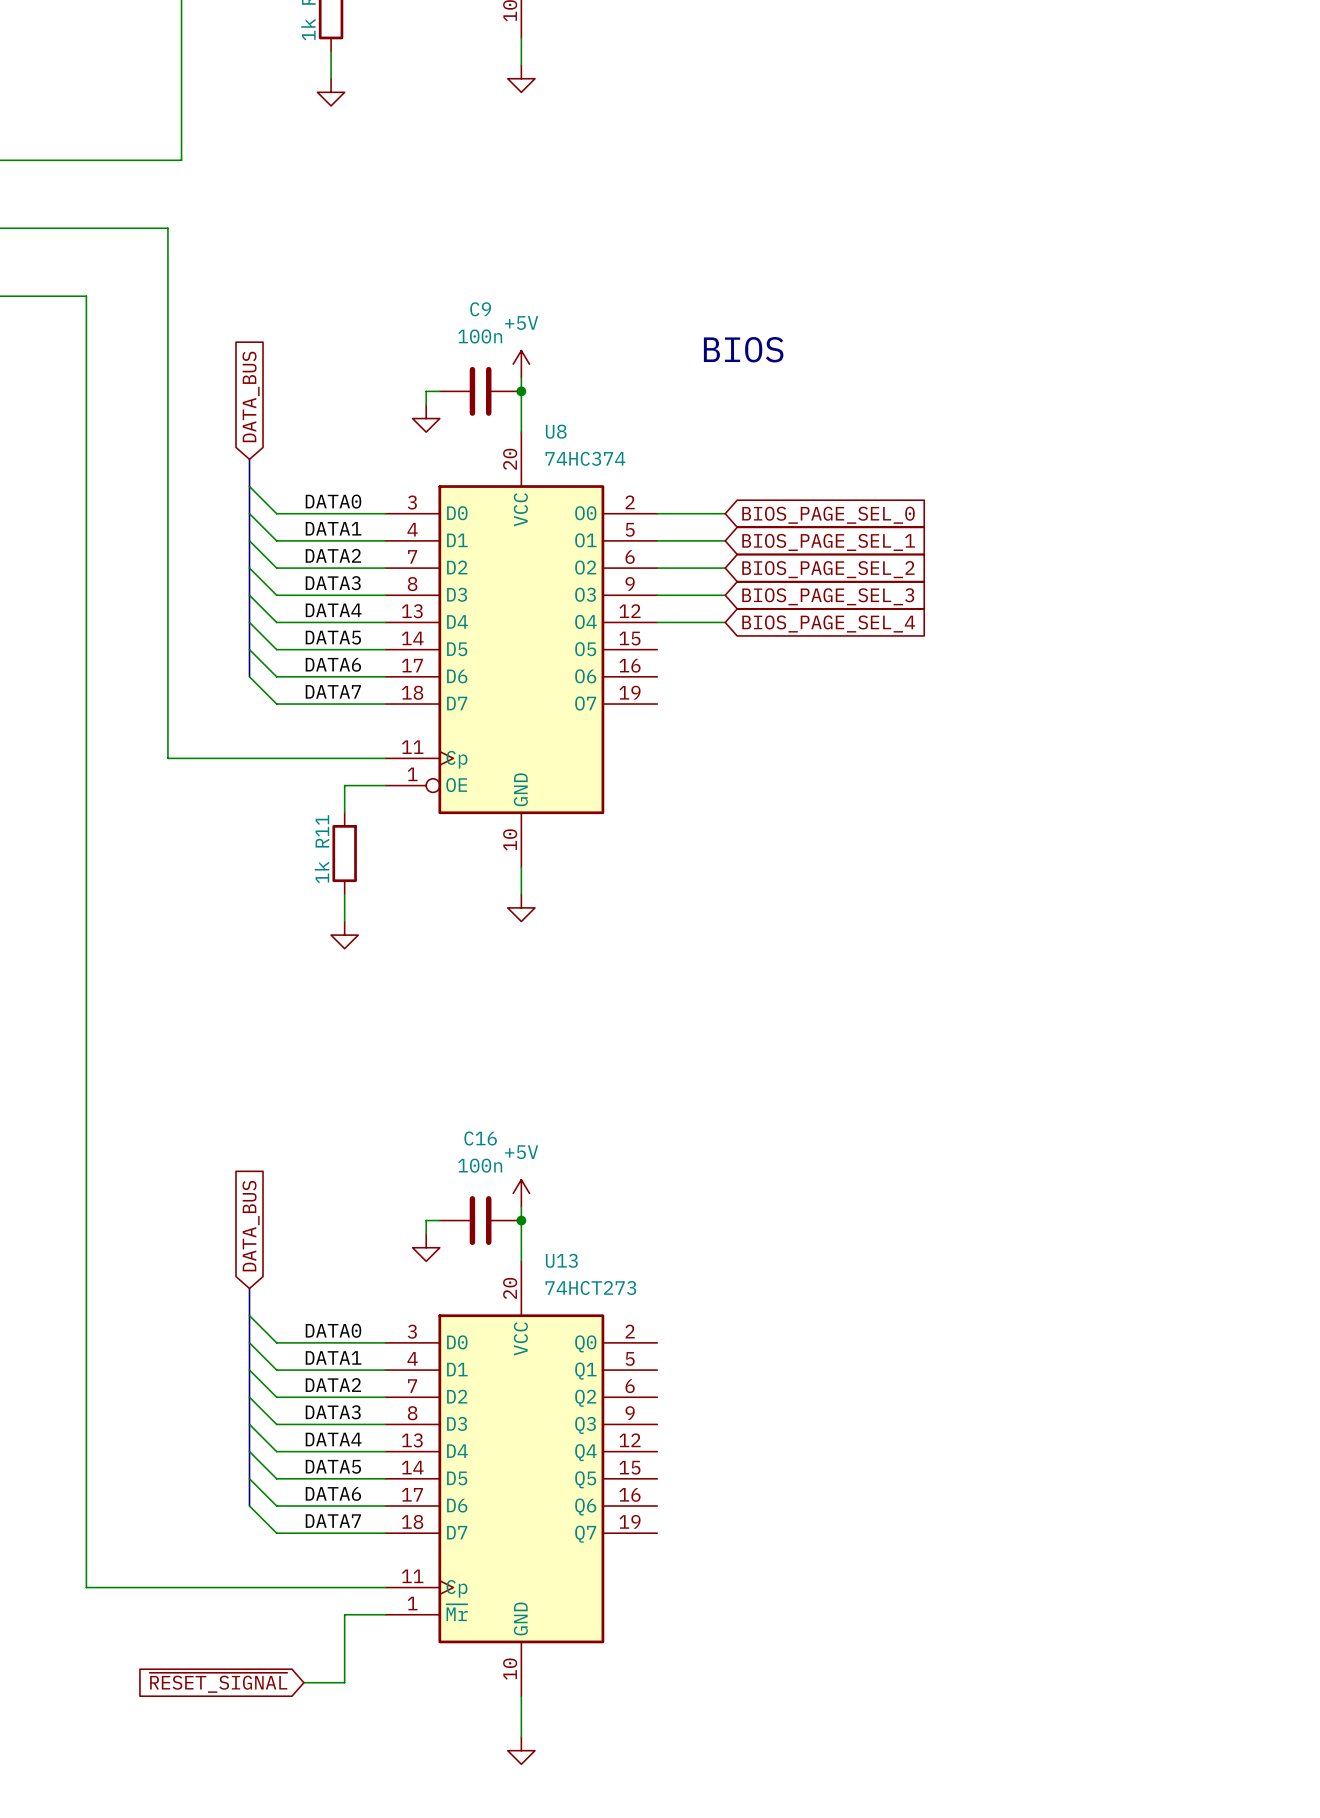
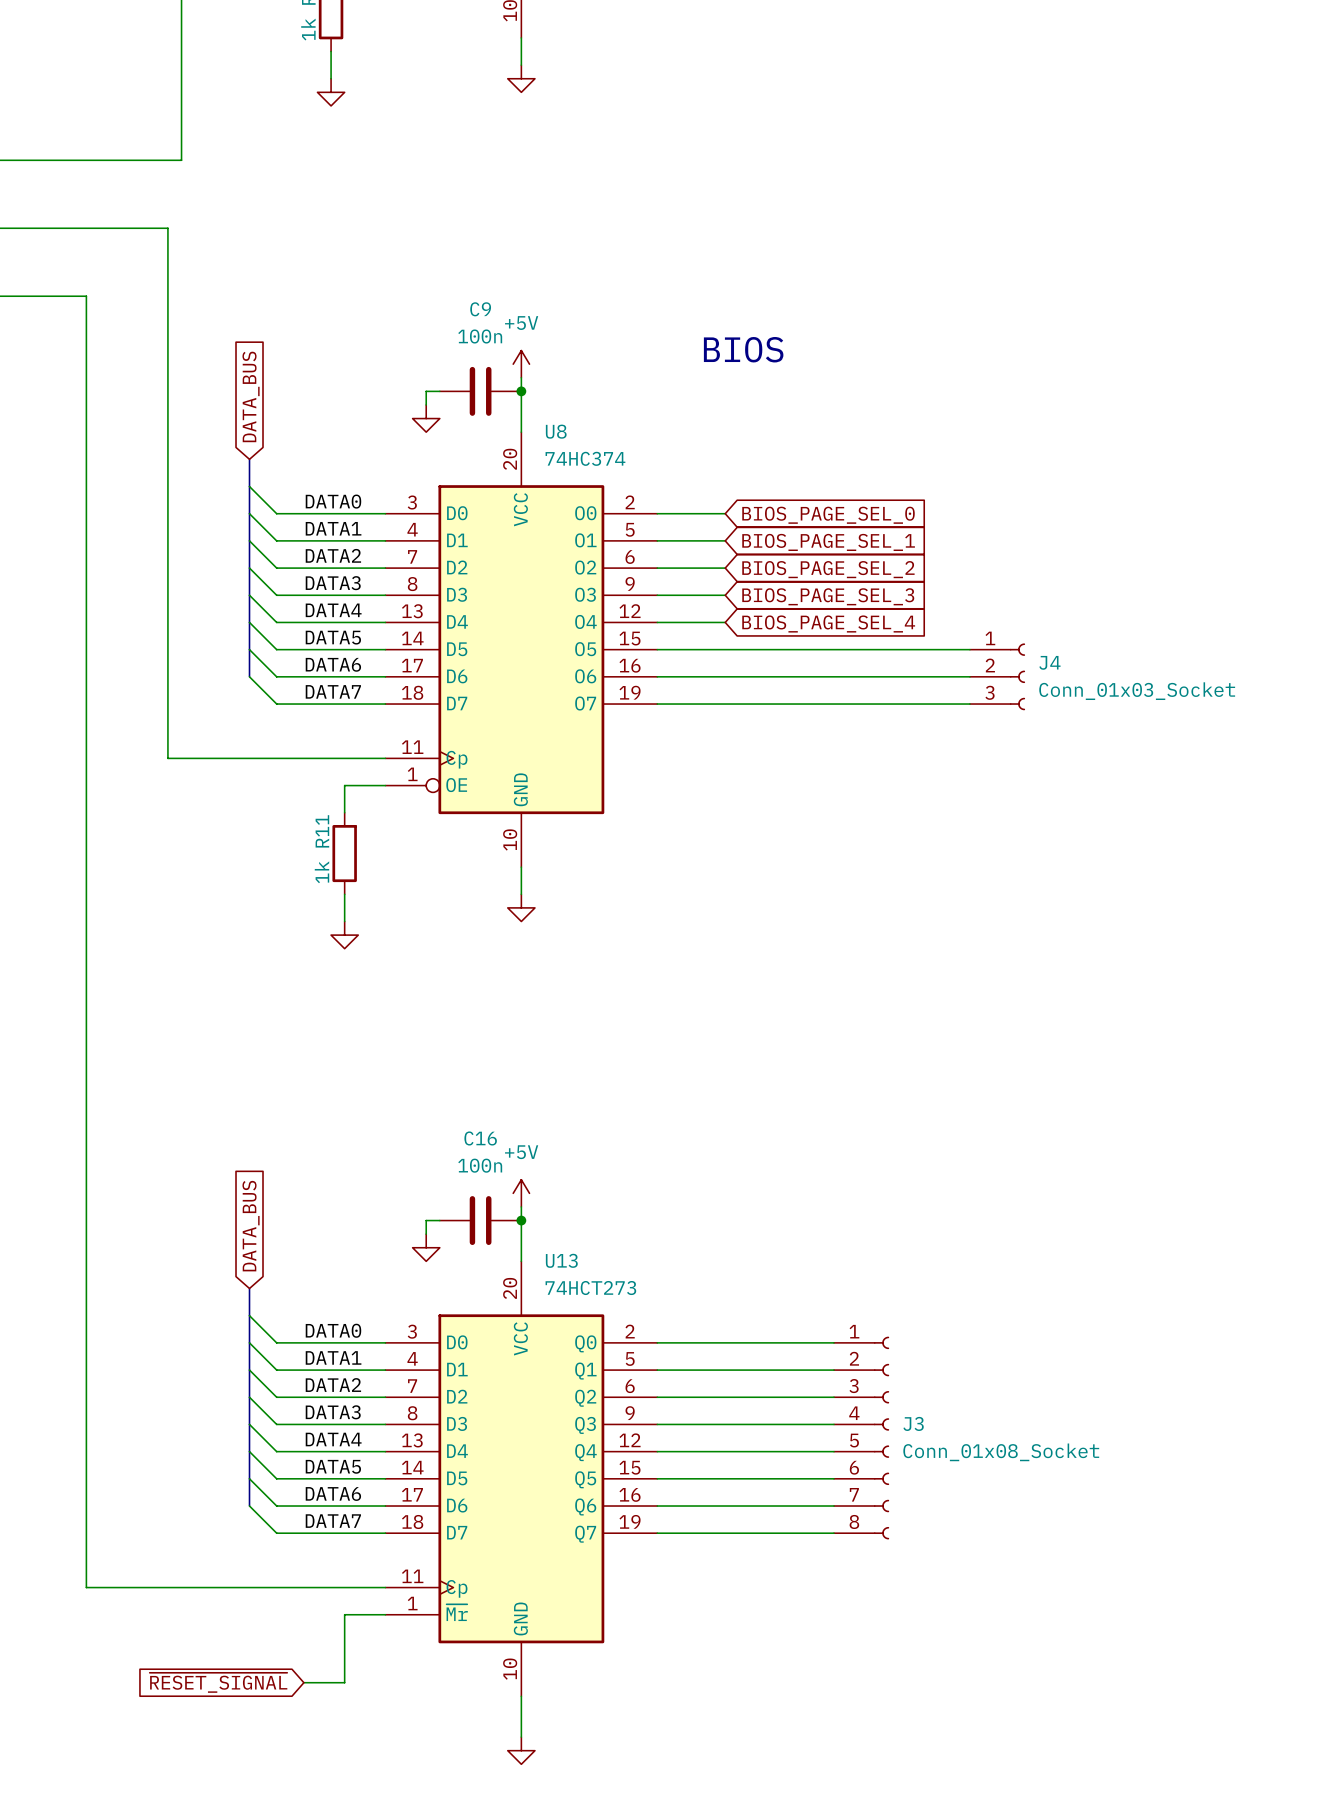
wire: none -> (657, 649) (969, 649)
wire: none -> (657, 676) (969, 676)
J4: none -> Conn_01x03_Socket (997, 676)
wire: none -> (657, 704) (969, 704)
wire: none -> (657, 1342) (834, 1342)
wire: none -> (657, 1370) (834, 1370)
wire: none -> (657, 1397) (834, 1397)
wire: none -> (657, 1424) (834, 1424)
J3: none -> Conn_01x08_Socket (861, 1438)
wire: none -> (657, 1451) (834, 1451)
wire: none -> (657, 1478) (834, 1478)
wire: none -> (657, 1506) (834, 1506)
wire: none -> (657, 1533) (834, 1533)

